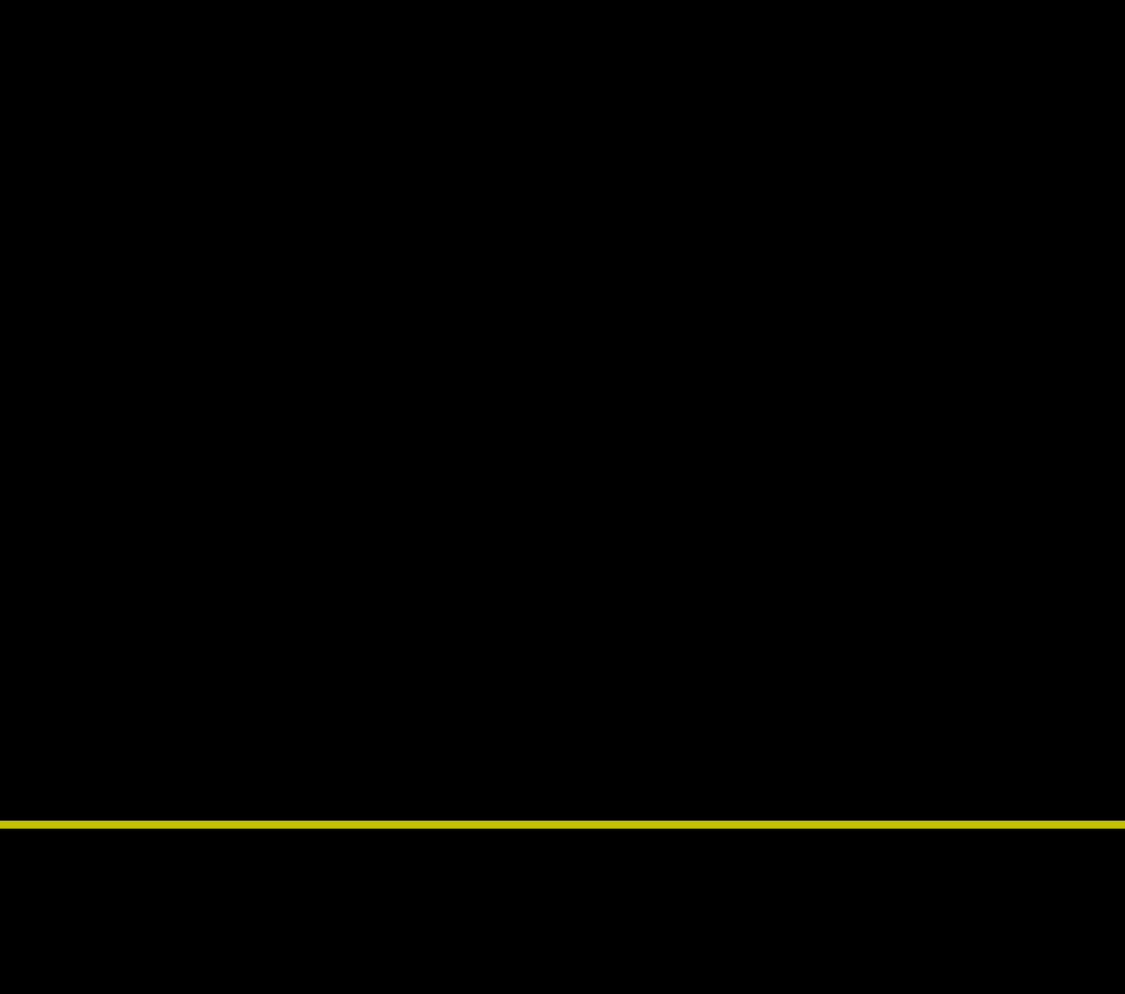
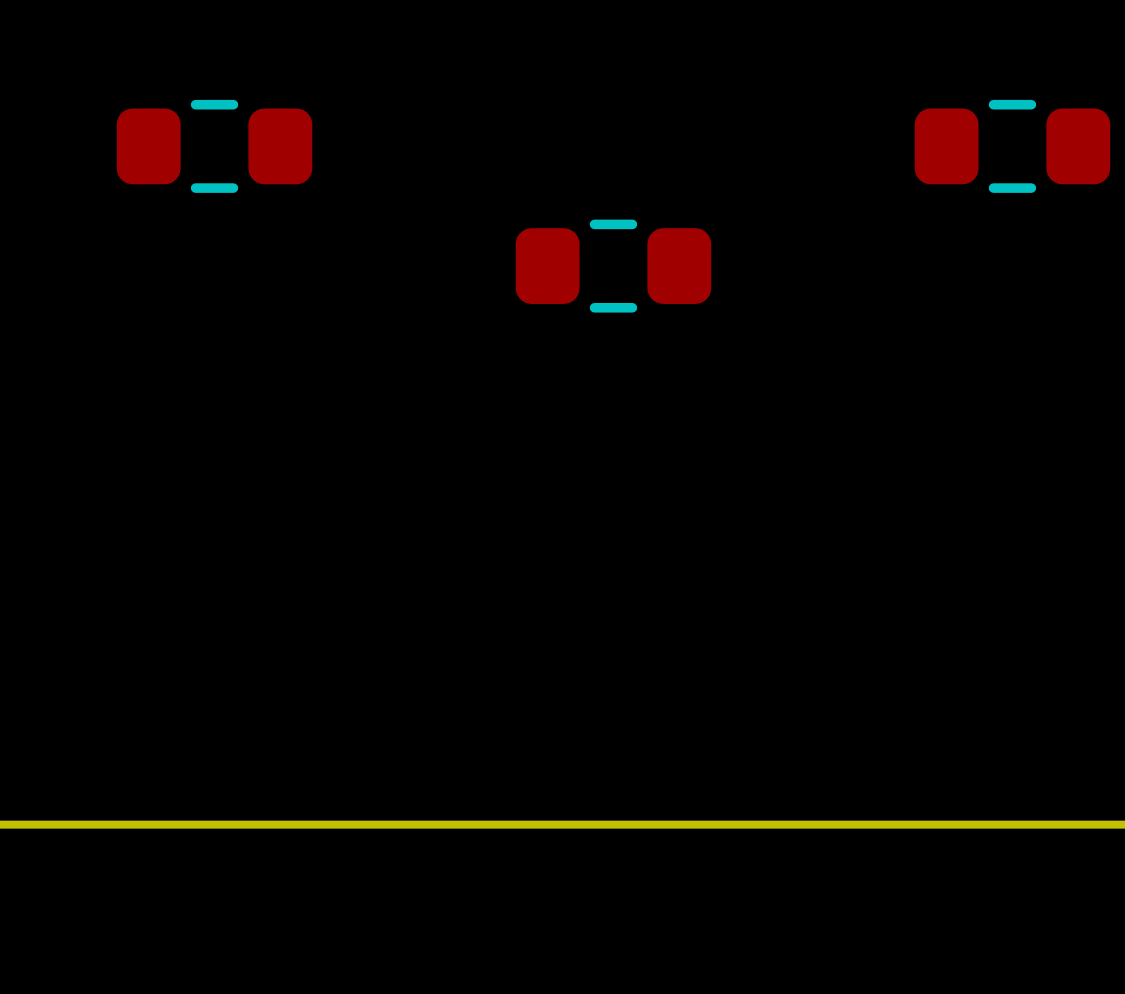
part: none -> (214, 146)
part: none -> (1012, 146)
part: none -> (613, 266)

